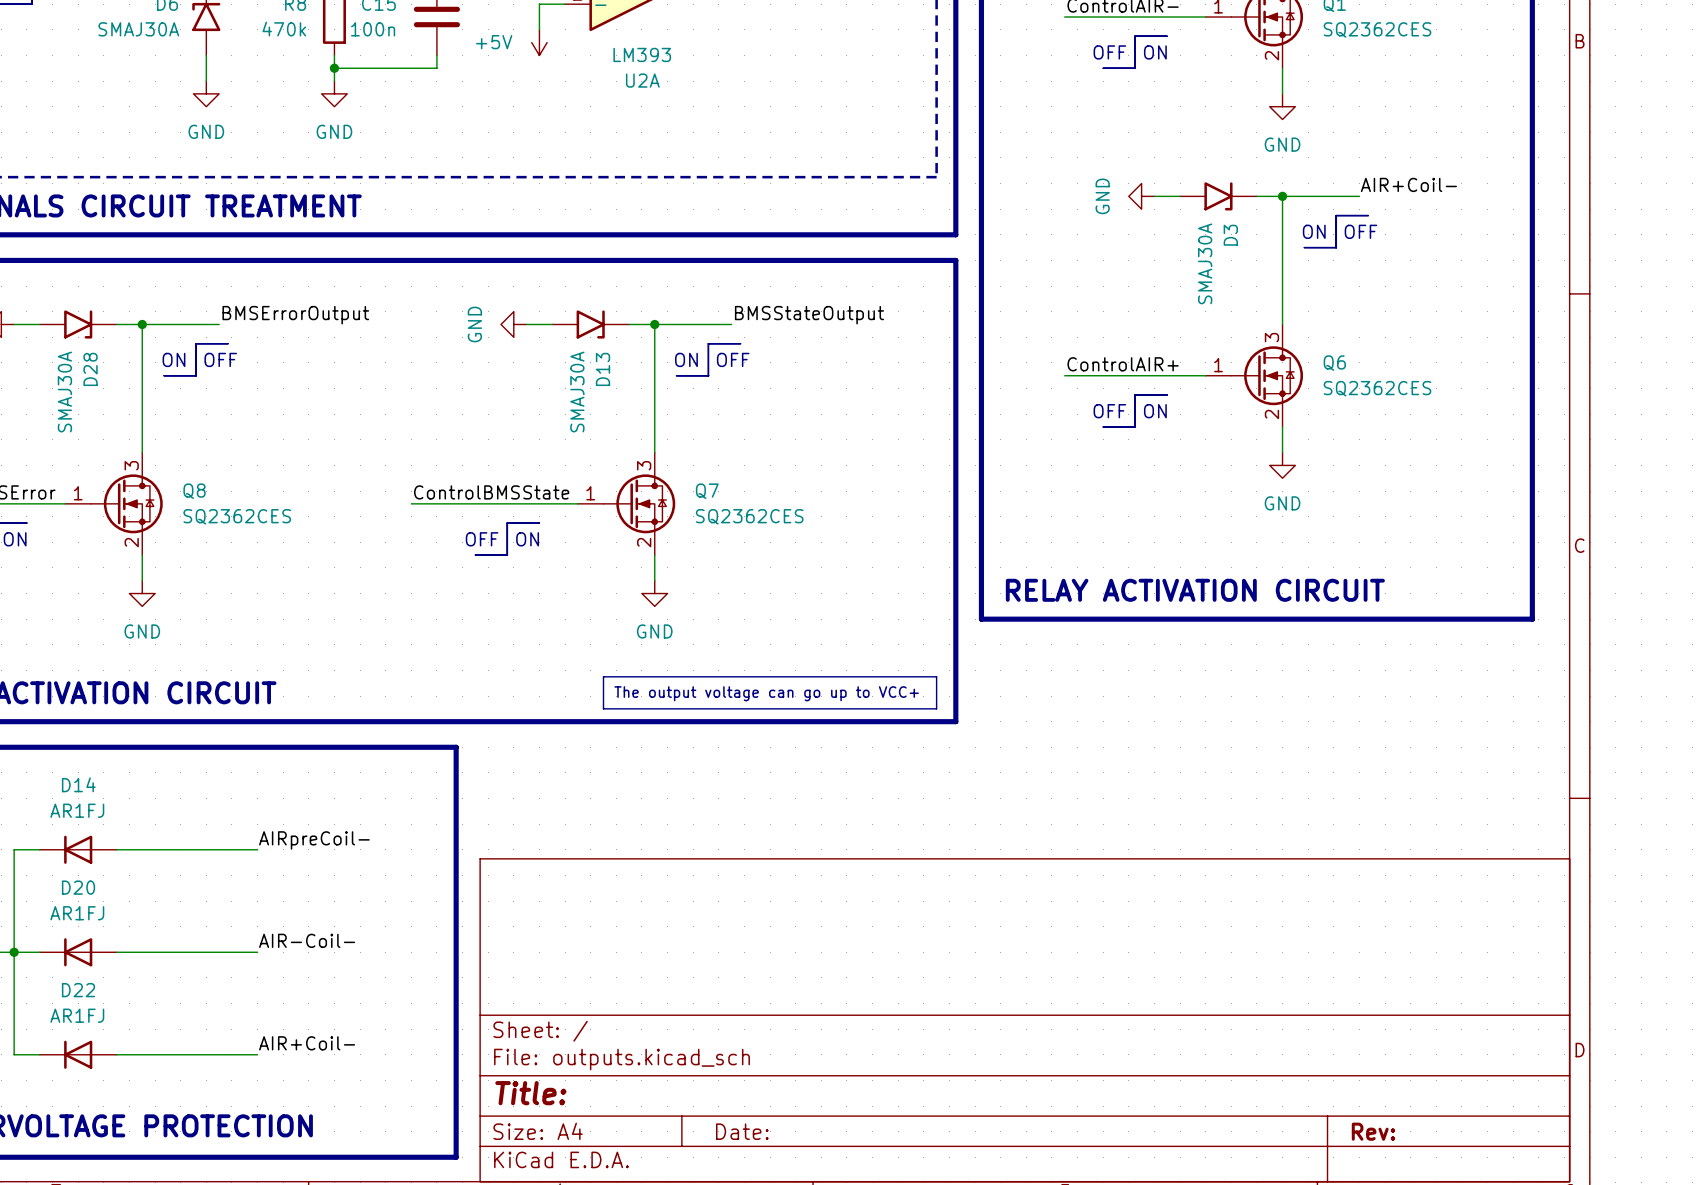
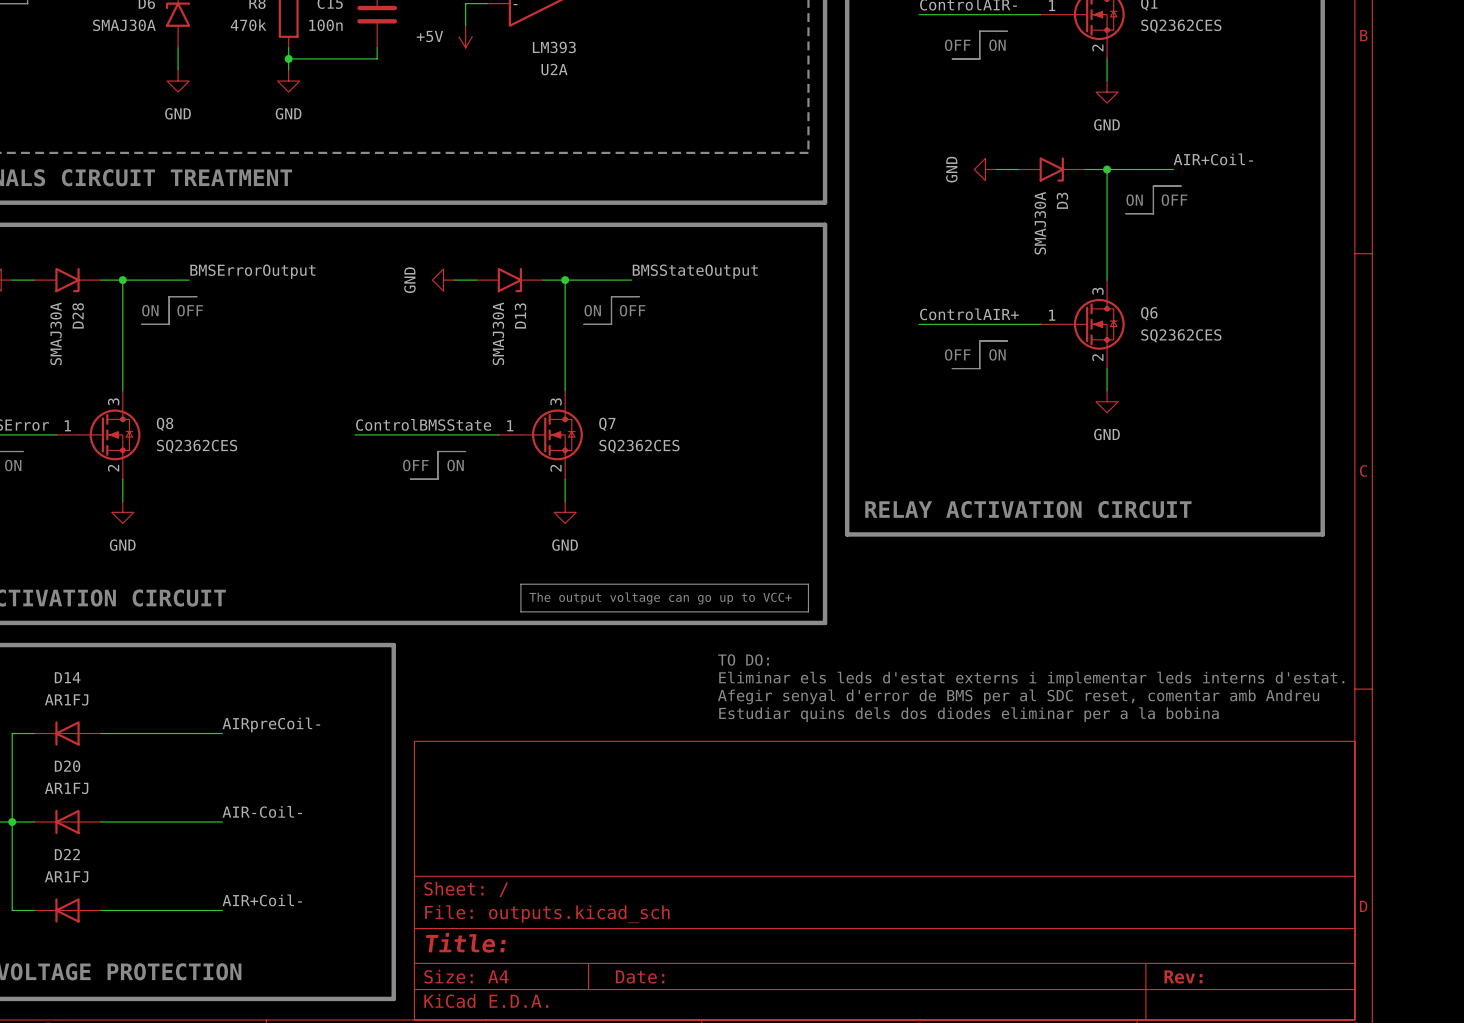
text: none -> TO DO: (743, 659)
text: none -> Eliminar els leds d'estat externs i implementar leds interns d'estat. (1031, 679)
text: none -> Afegir senyal d'error de BMS per al SDC reset, comentar amb Andreu (1018, 696)
text: none -> Estudiar quins dels dos diodes eliminar per a la bobina (969, 714)

